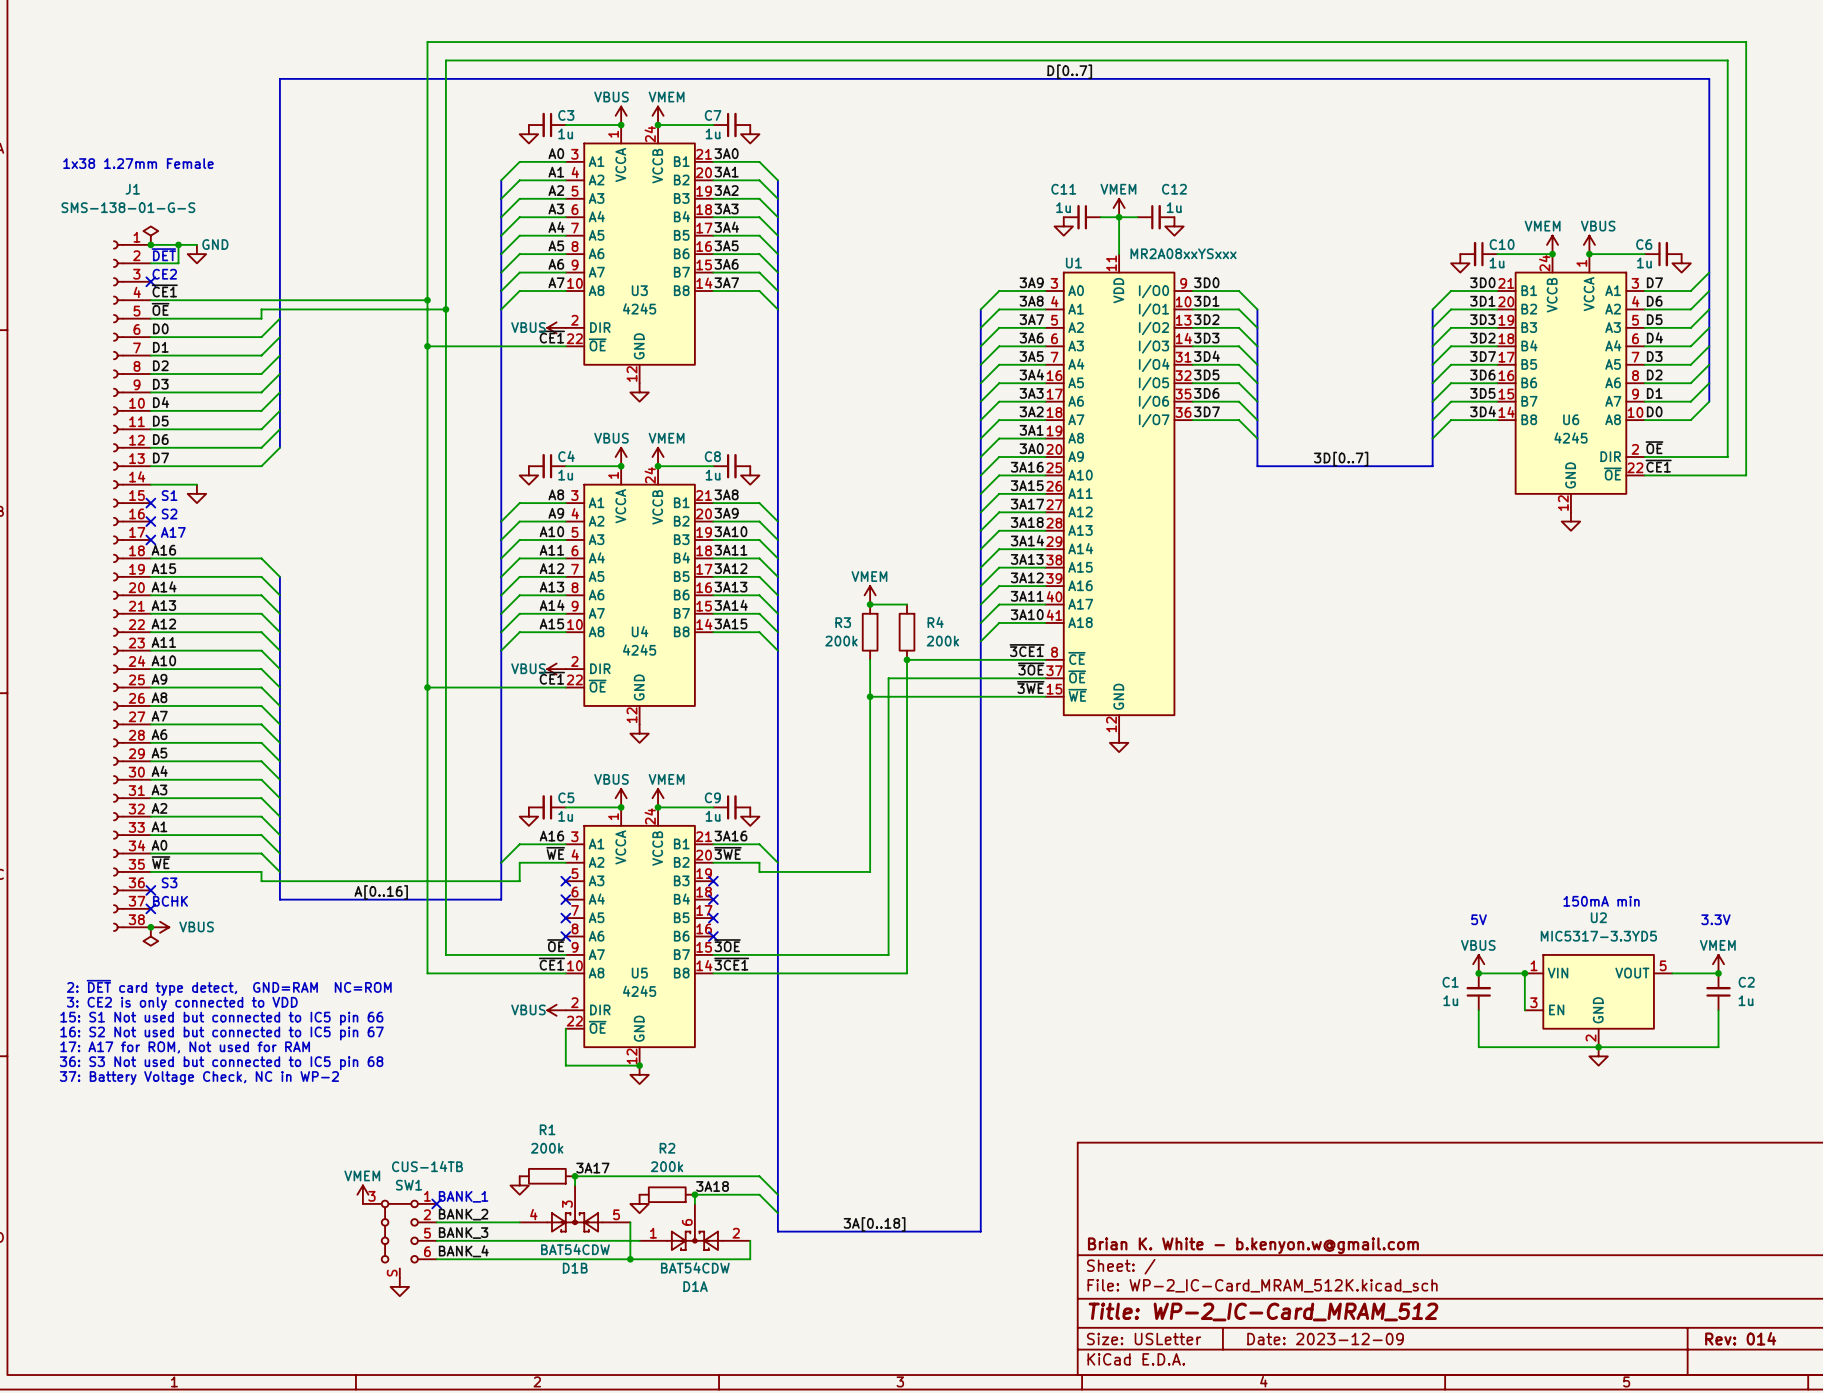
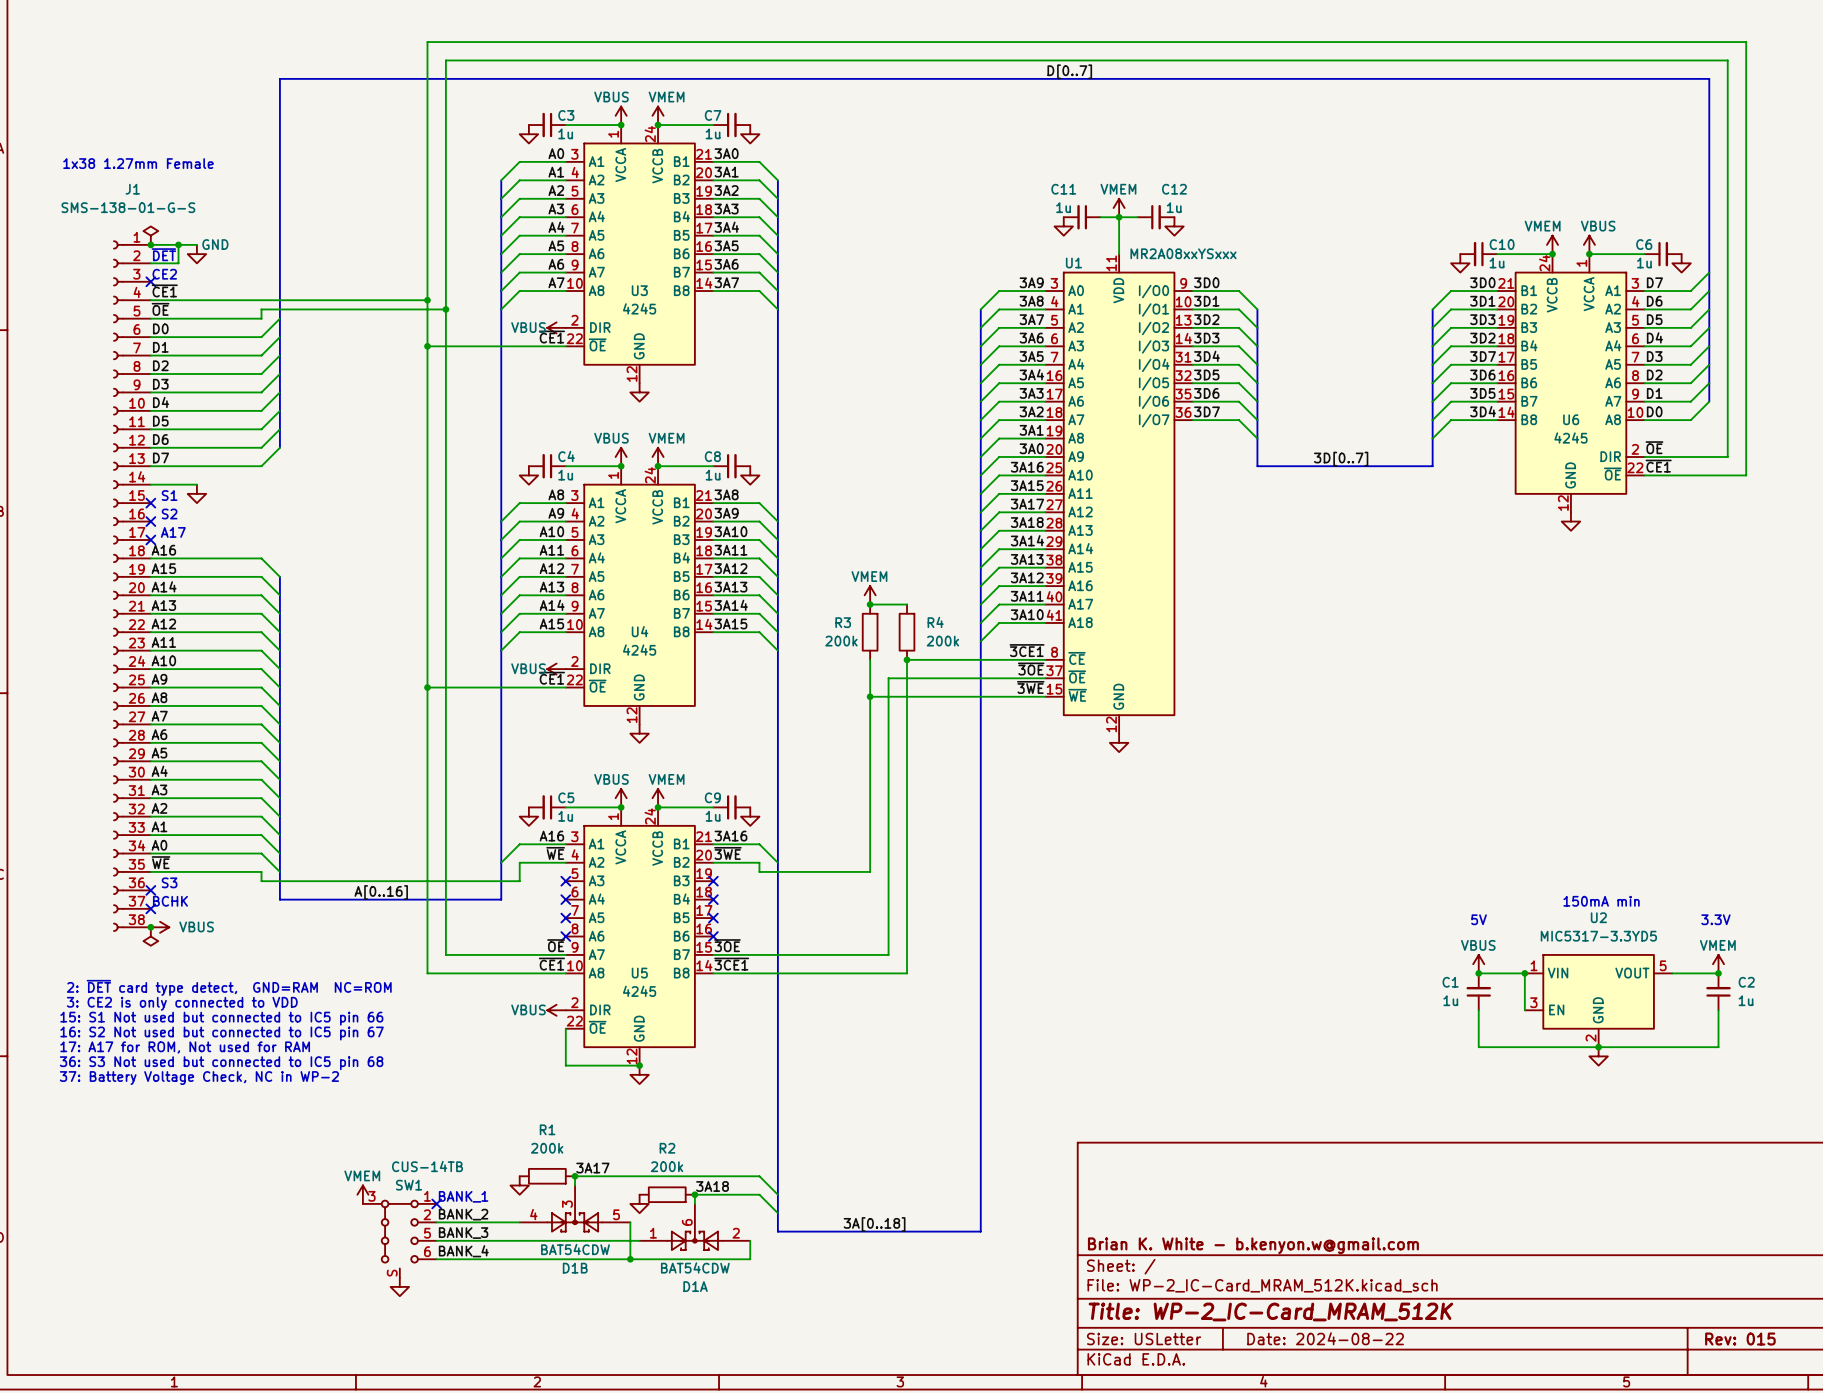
title block: Title: WP-2_IC-Card_MRAM_512 (1263, 1311) -> Title: WP-2_IC-Card_MRAM_512K (1270, 1311)
title block: Rev: 014 (1740, 1338) -> Rev: 015 (1740, 1339)
title block: Date: 2023-12-09 (1325, 1339) -> Date: 2024-08-22 (1325, 1338)

